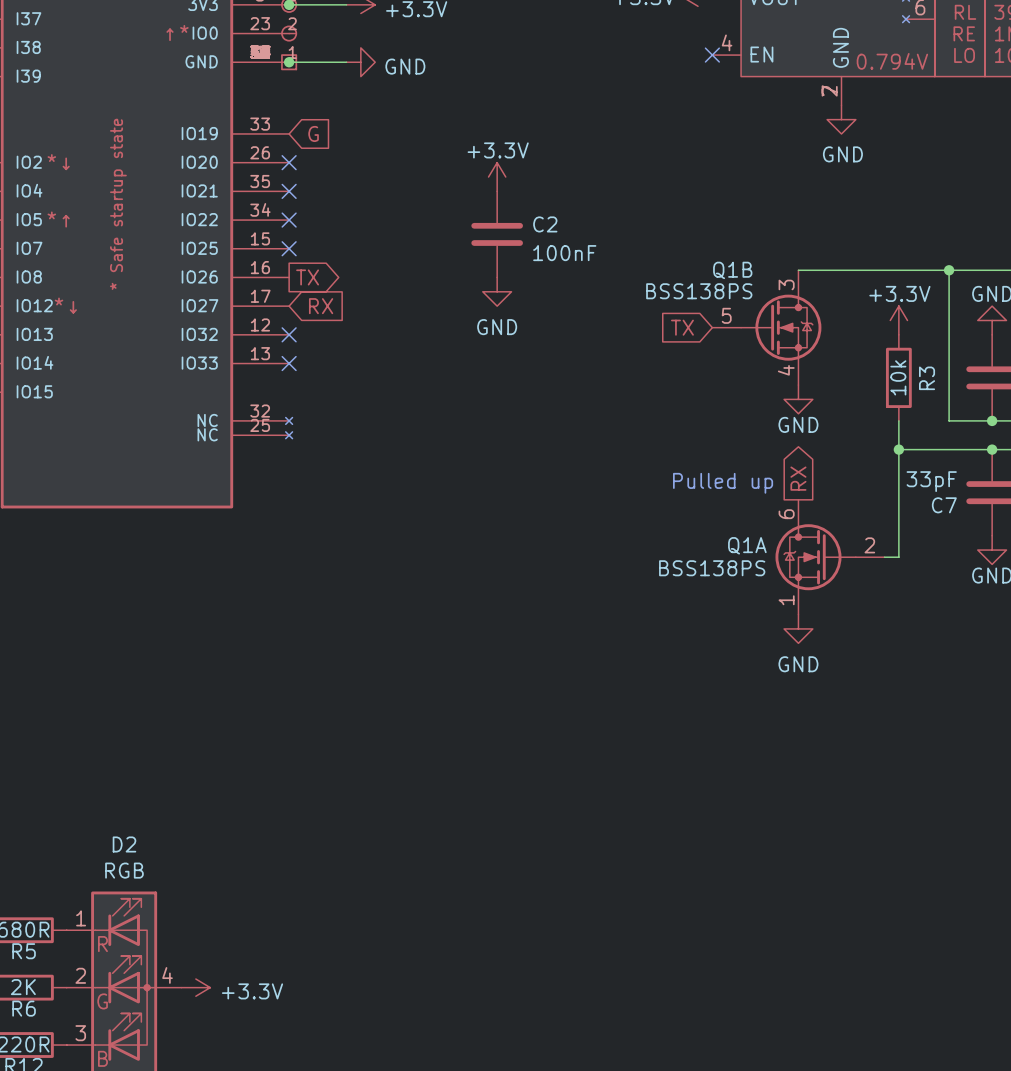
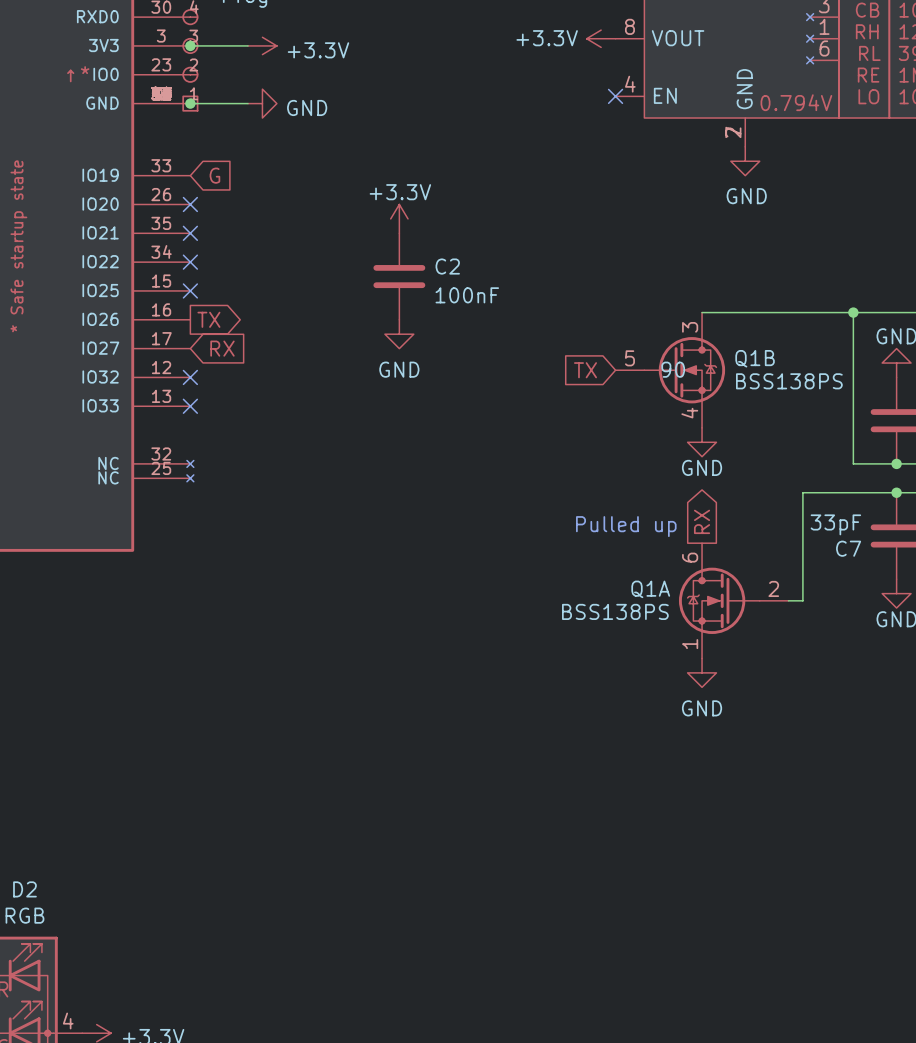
Q1B name position: Q1B (732, 270) -> Q1B (755, 358)
Q1B value position: BSS138PS (699, 291) -> BSS138PS (789, 381)
power symbol: +3.3V (898, 320) -> none
Q1B text: none -> 90 (673, 369)
R3: 10k (898, 377) -> none
wire: (898, 420) (898, 449) -> none
junction: (898, 449) -> none

